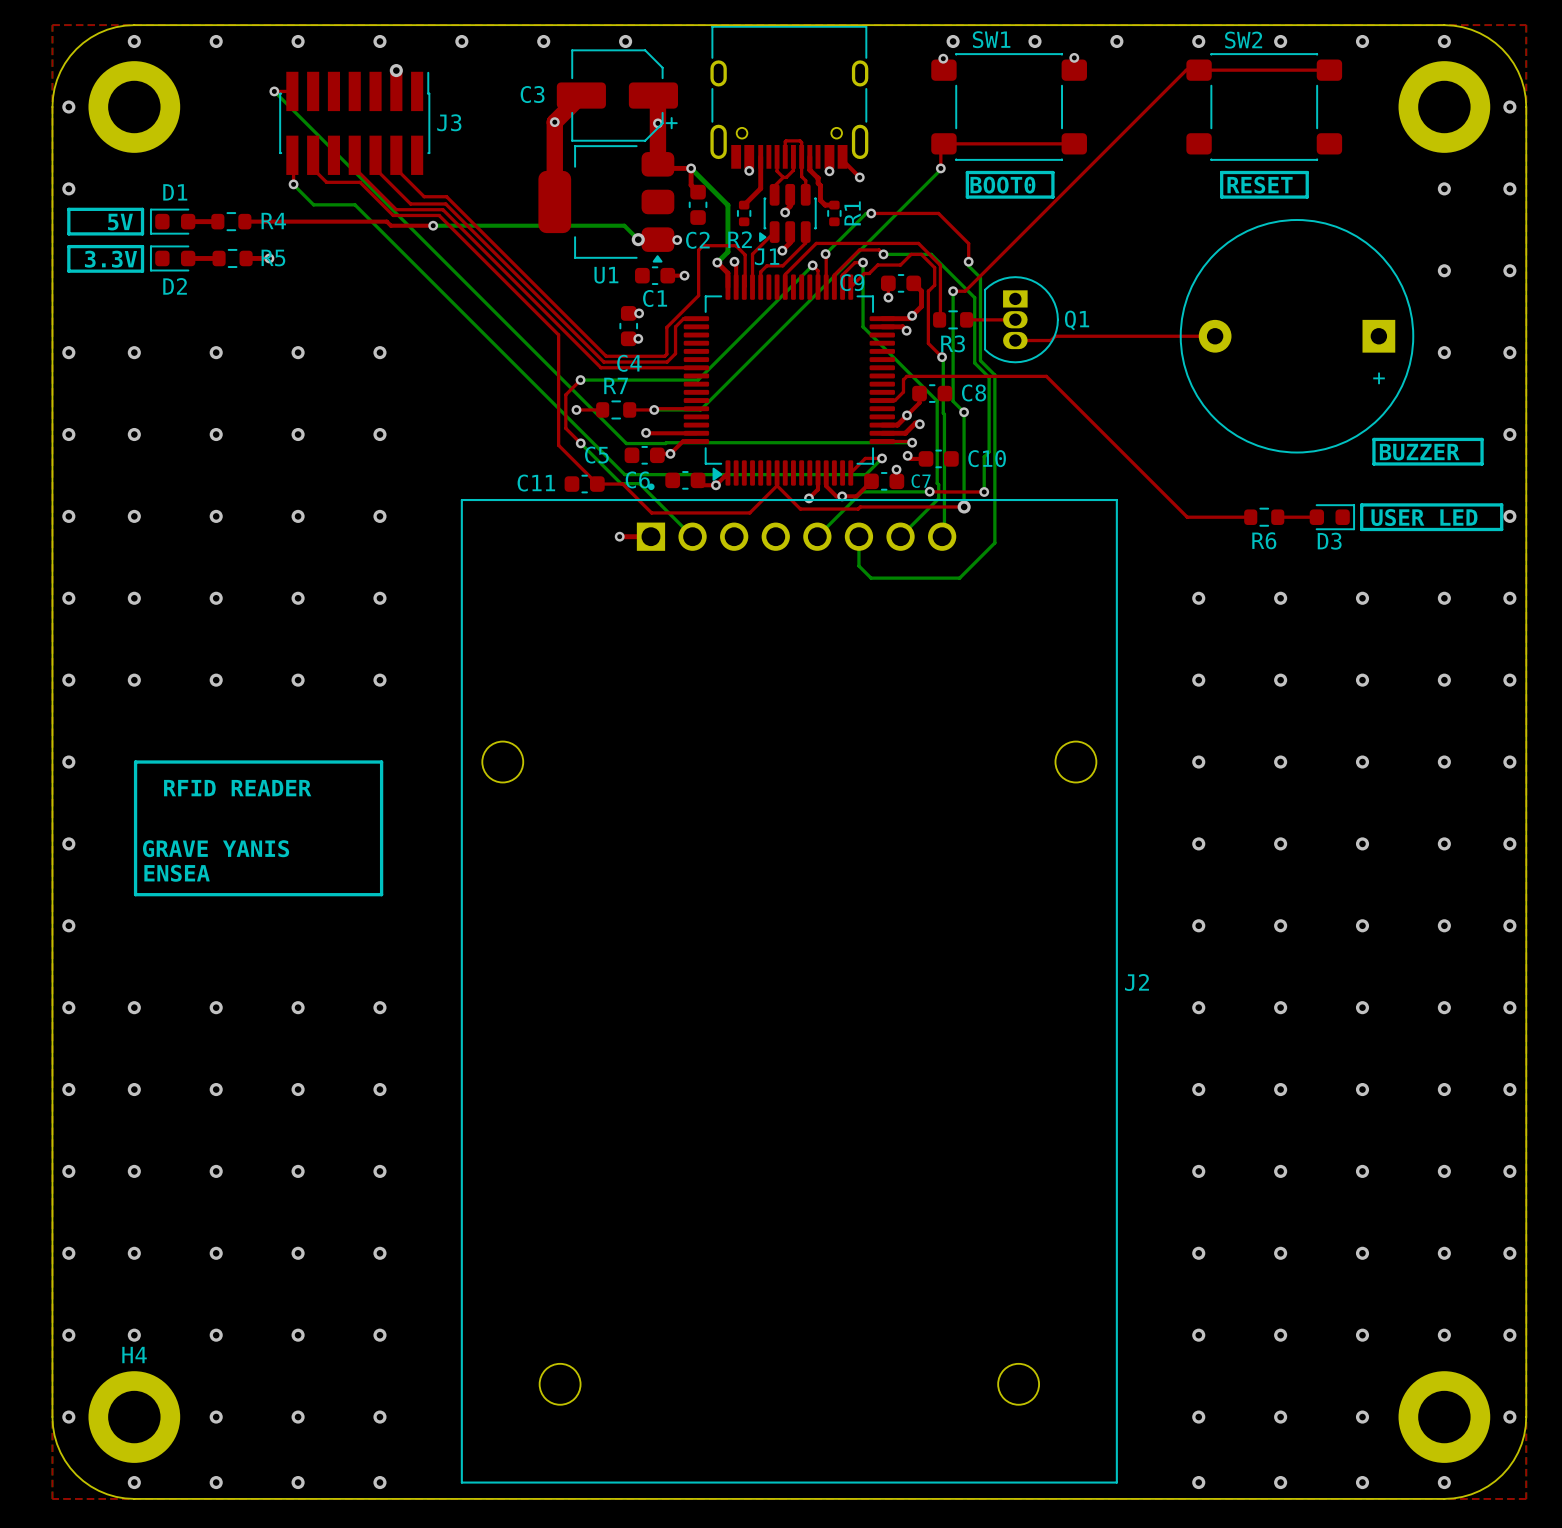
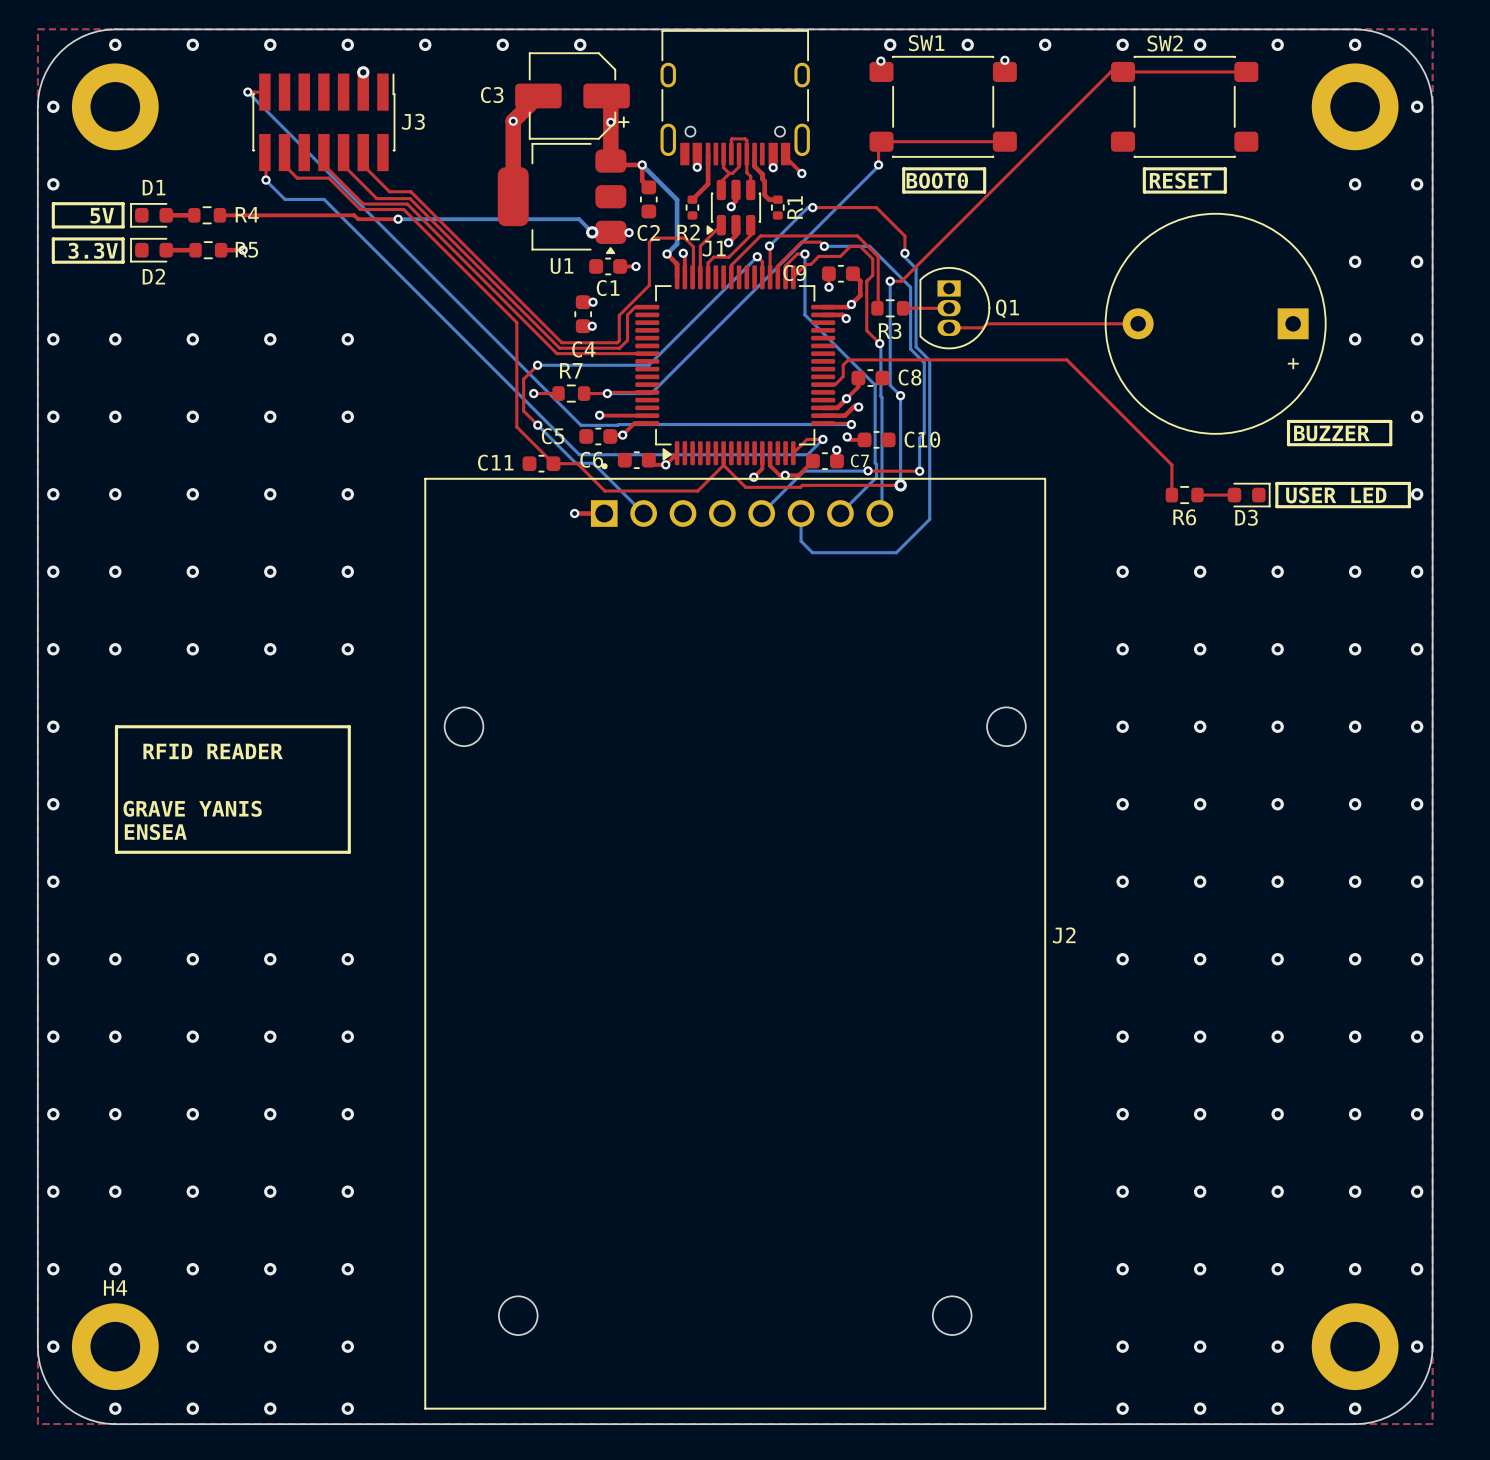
top track: (906, 376) (1046, 376) (1187, 517) (1250, 517) -> (846, 361) (848, 359) (1066, 359) (1171, 464) (1171, 495)

